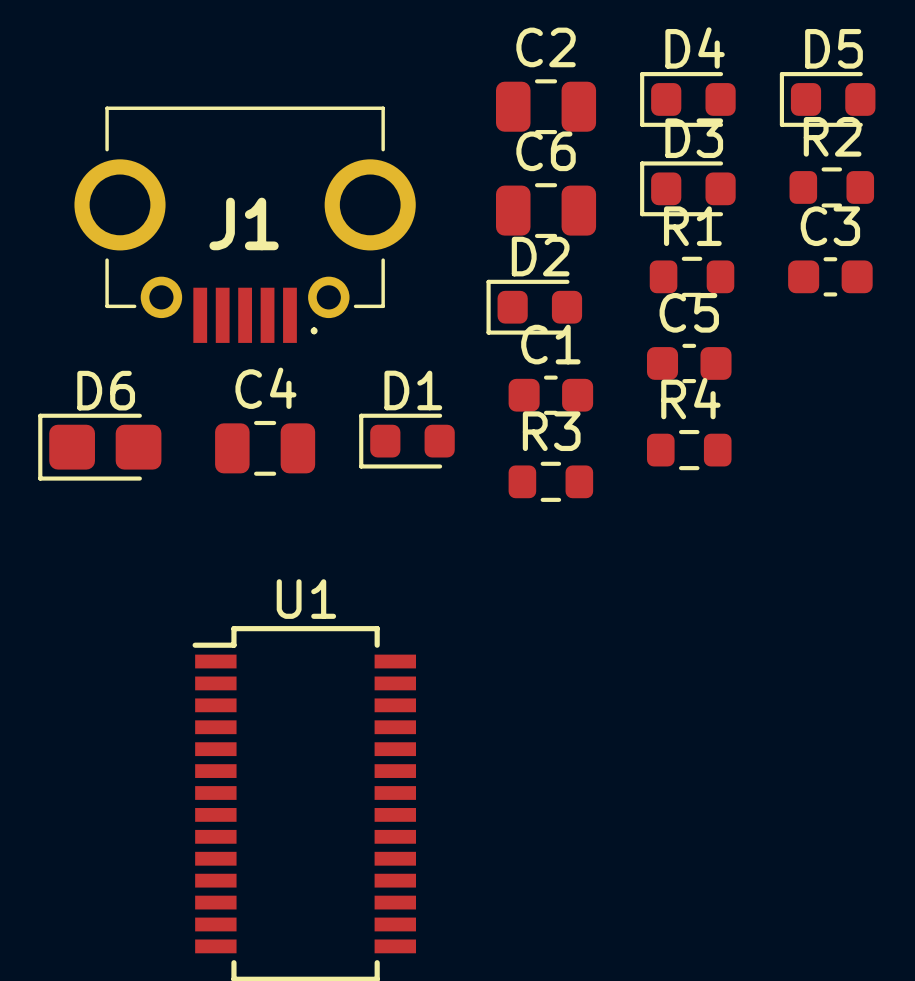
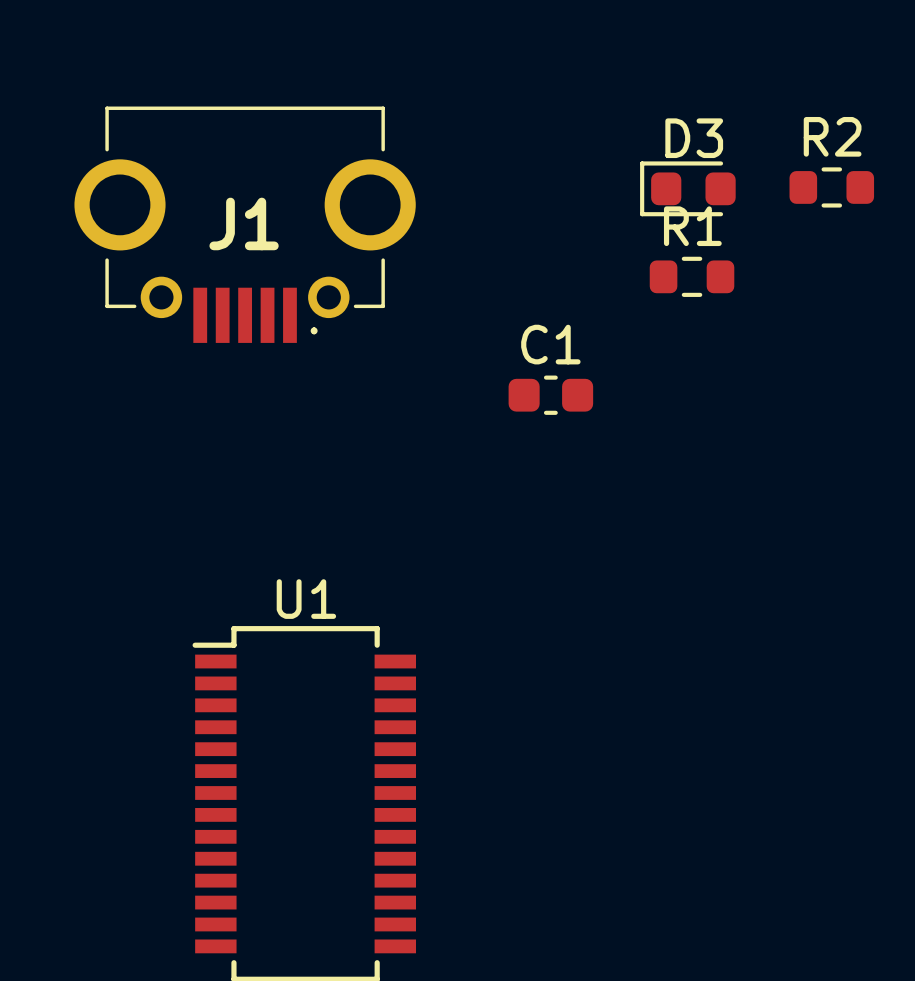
D4: (687, 99) -> none
D5: (827, 99) -> none
C2: (546, 106) -> none
C6: (546, 210) -> none
C3: (830, 276) -> none
D2: (534, 307) -> none
C5: (689, 363) -> none
D1: (406, 441) -> none
D6: (99, 447) -> none
C4: (265, 448) -> none
R4: (689, 450) -> none
R3: (550, 481) -> none

